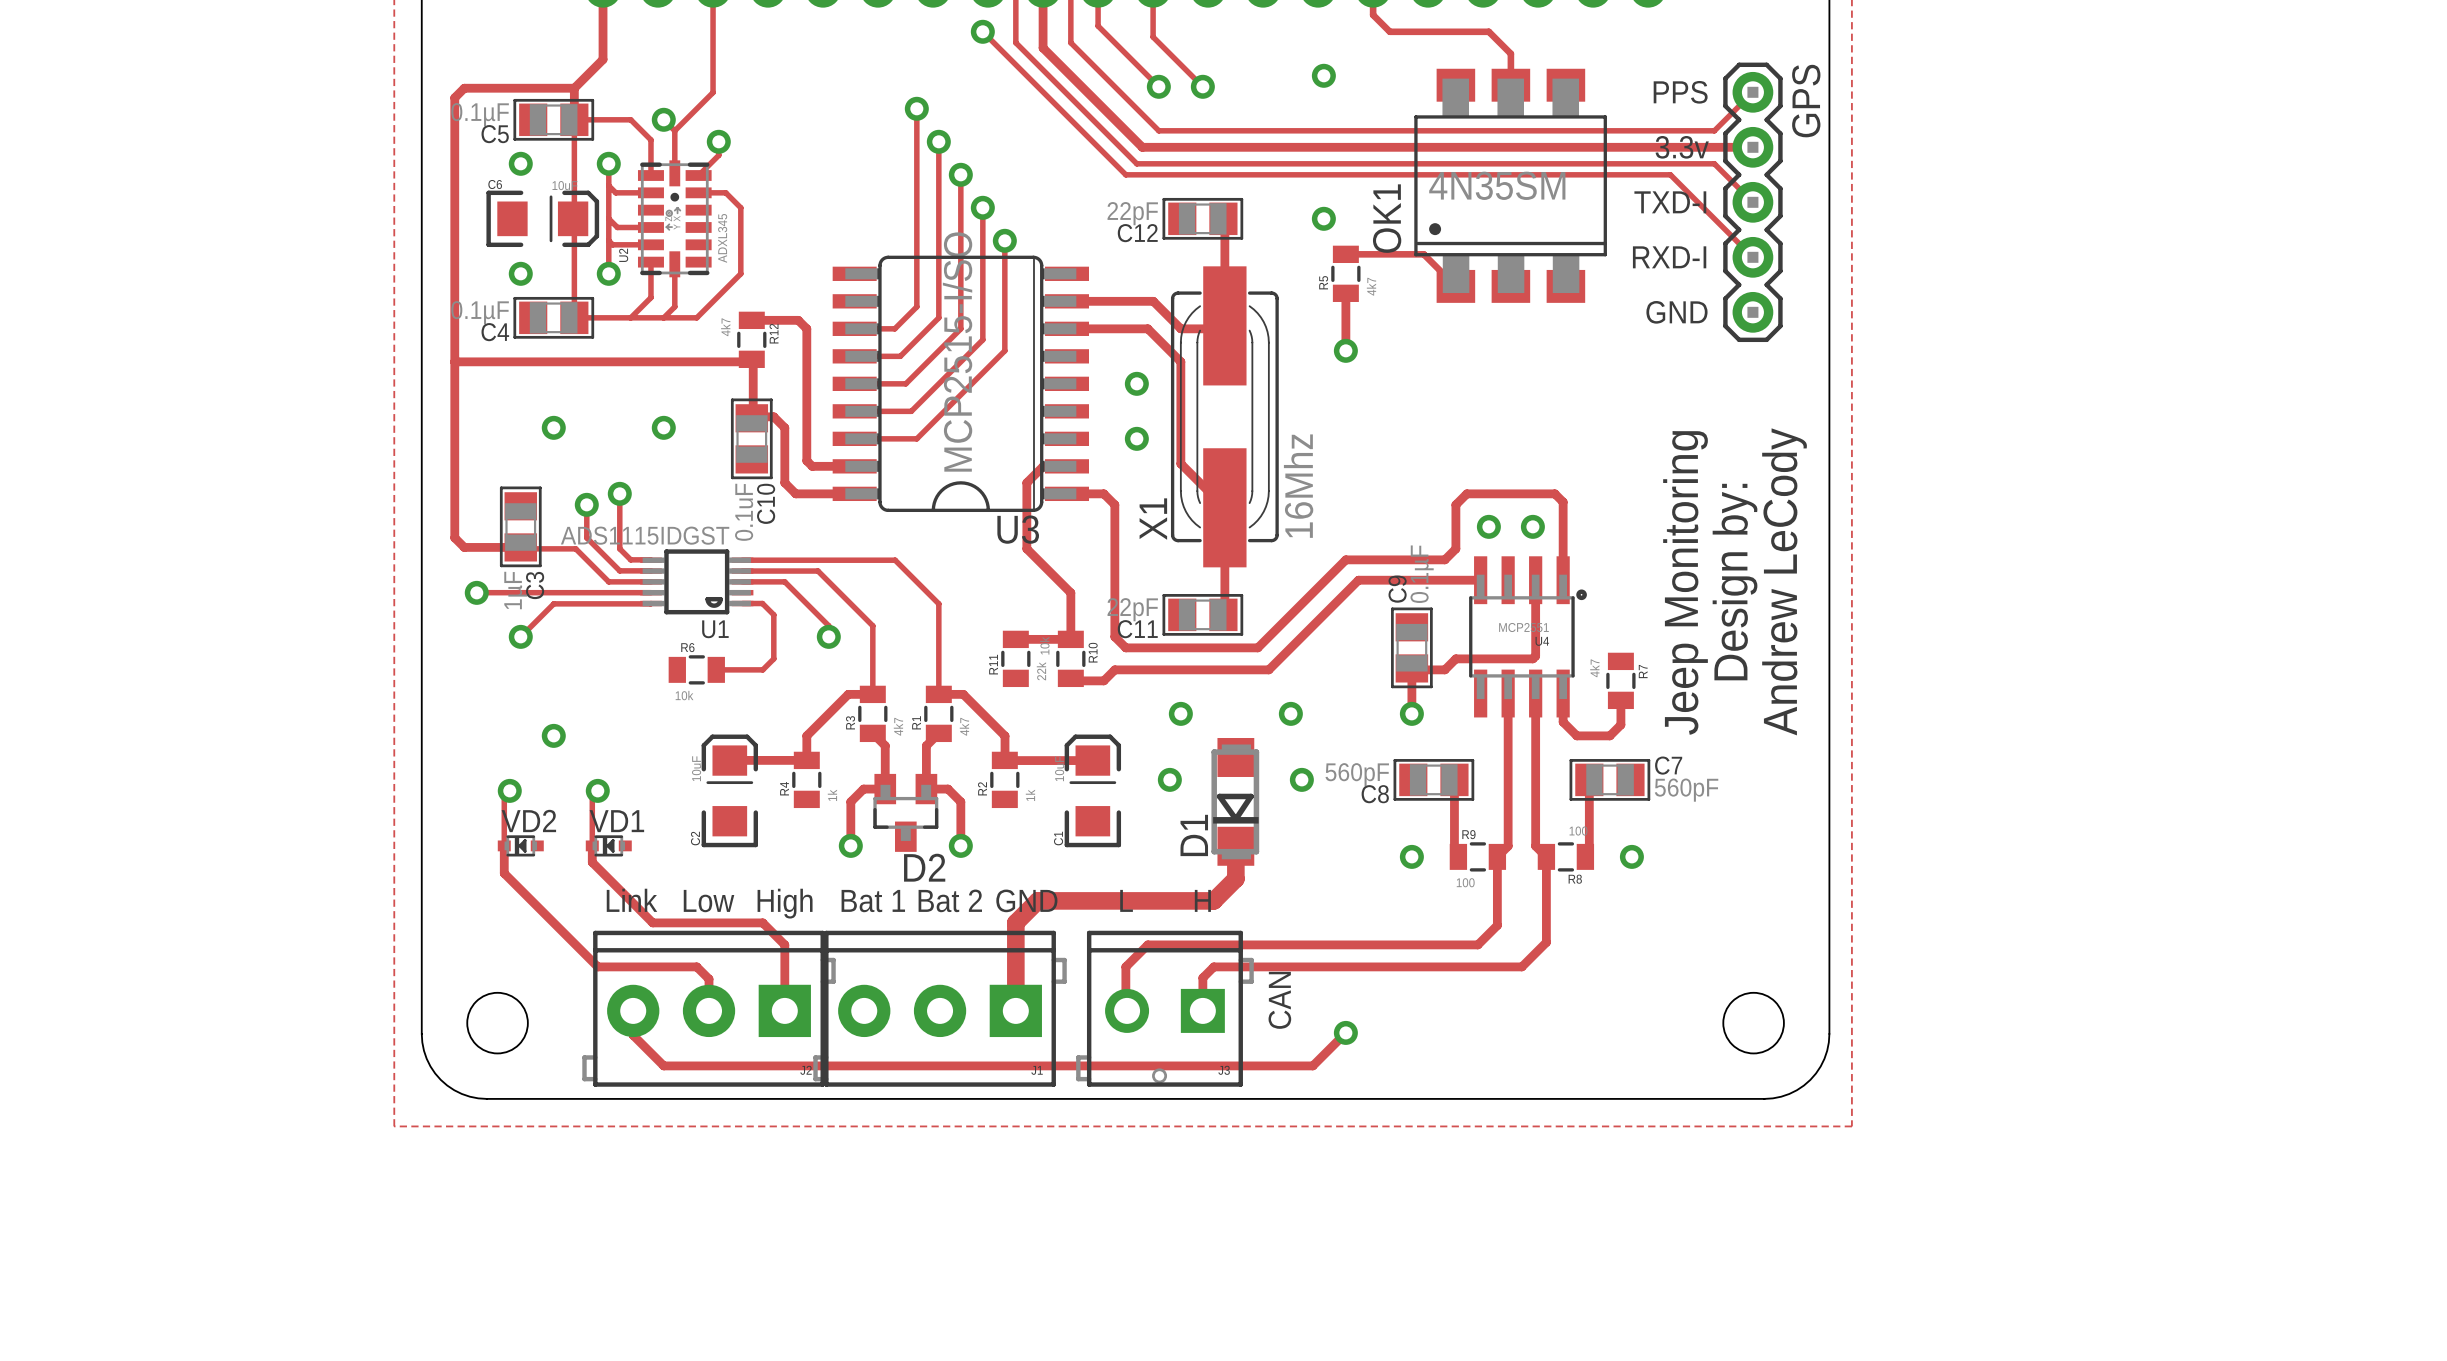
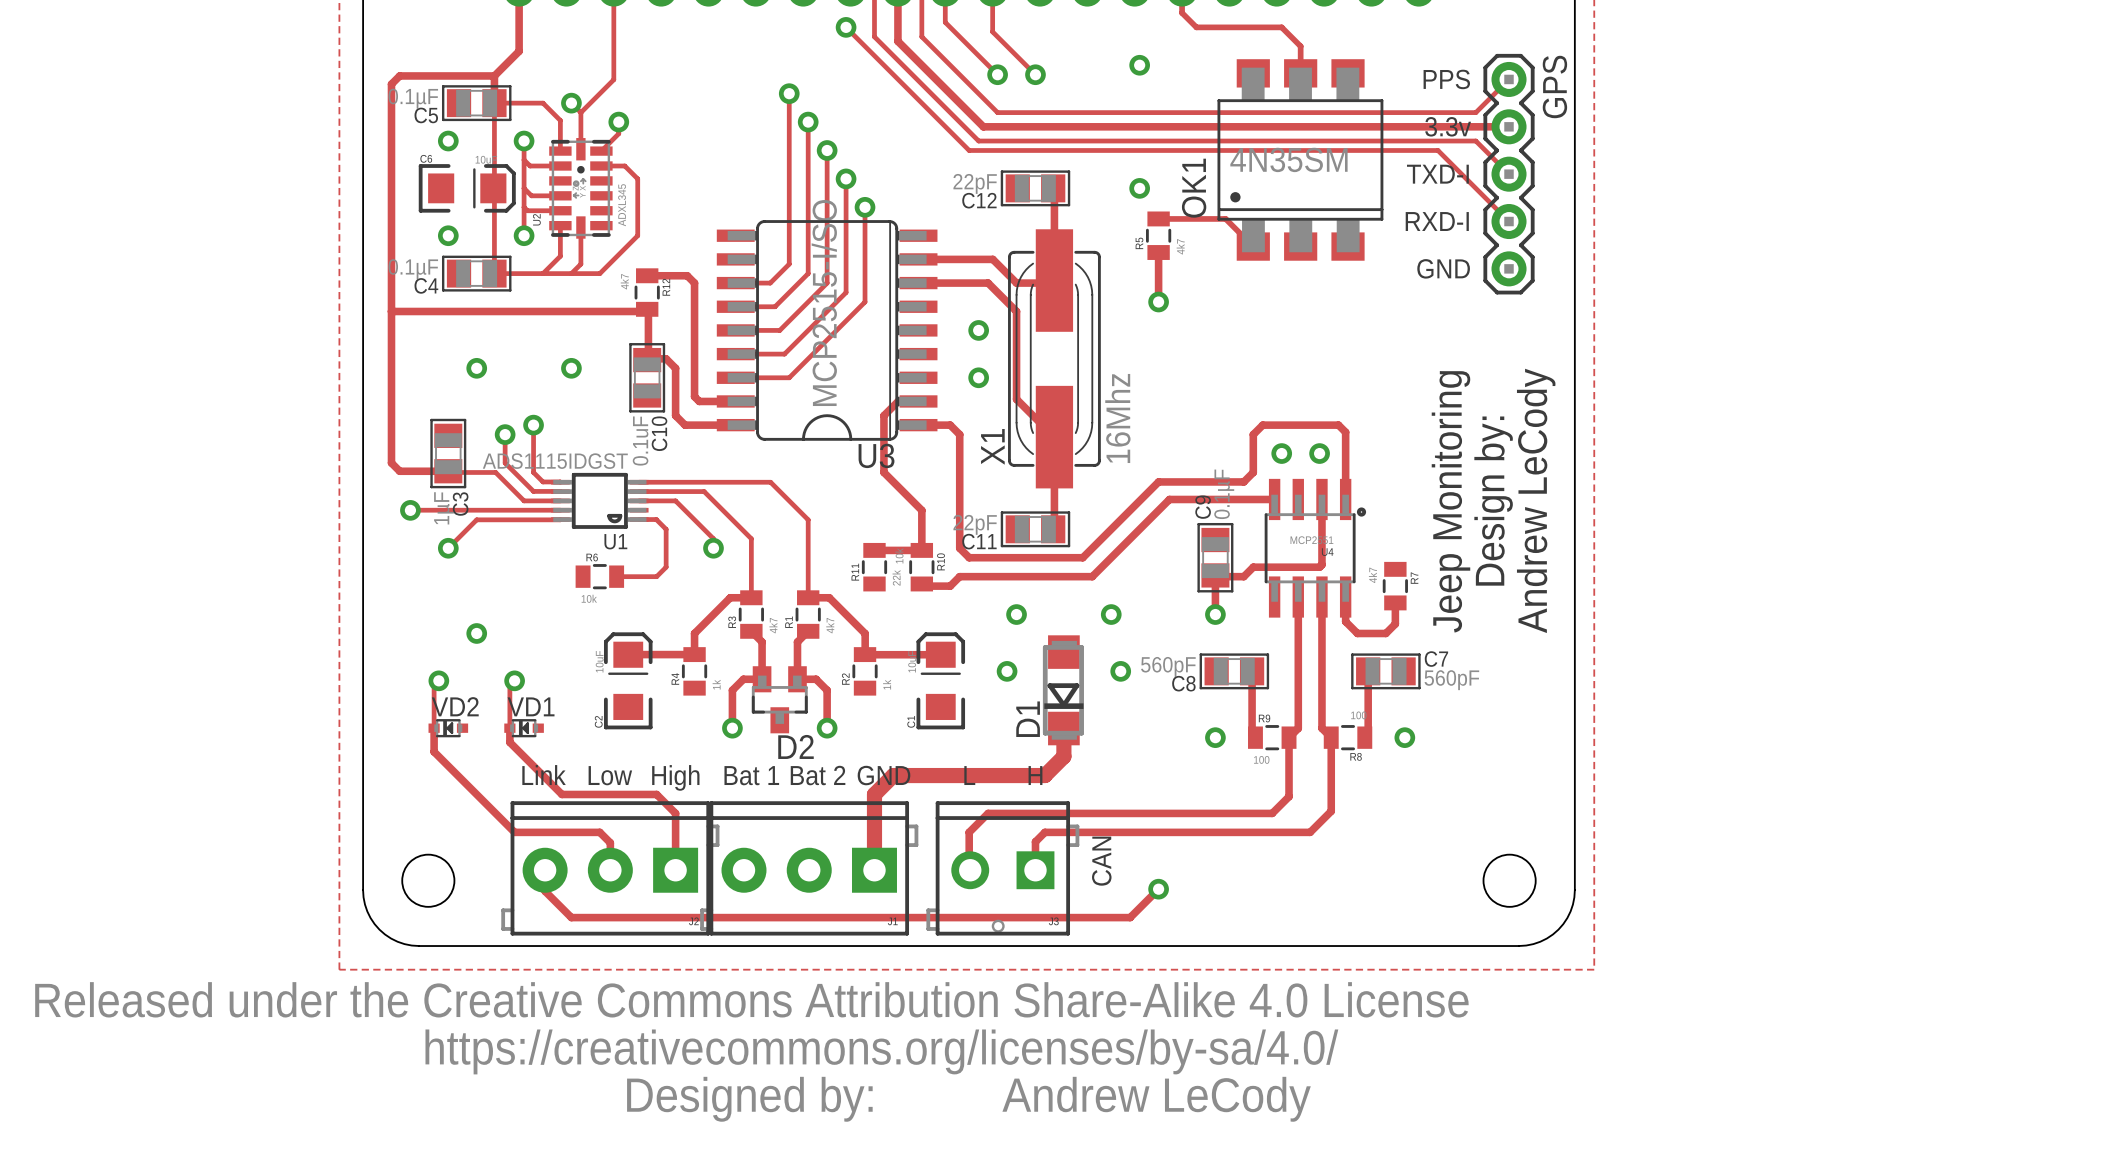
drawing: none -> [35, 982, 1469, 1122]
text: none -> Andrew LeCody (1156, 1099)

